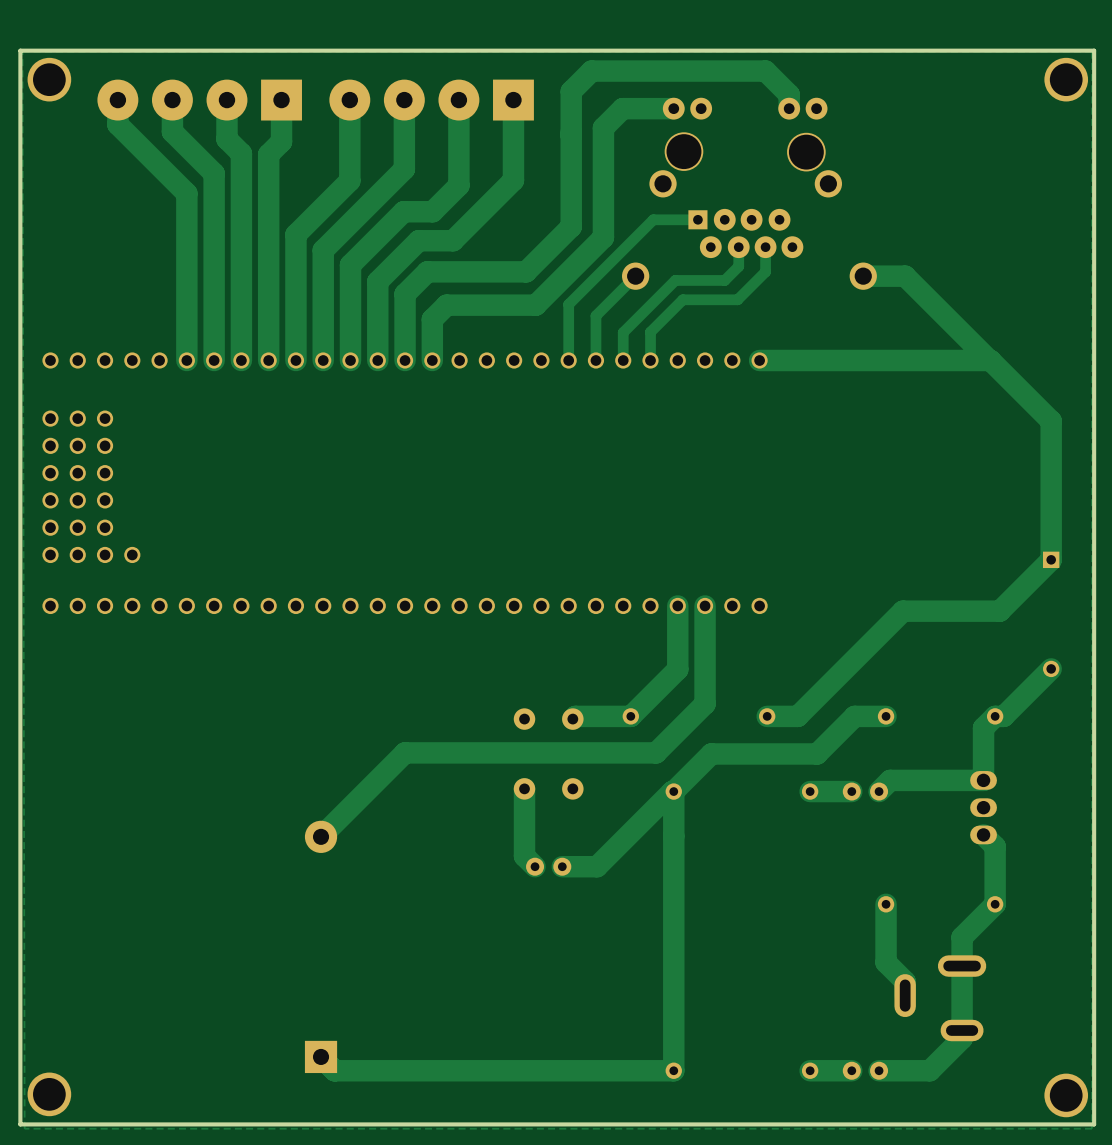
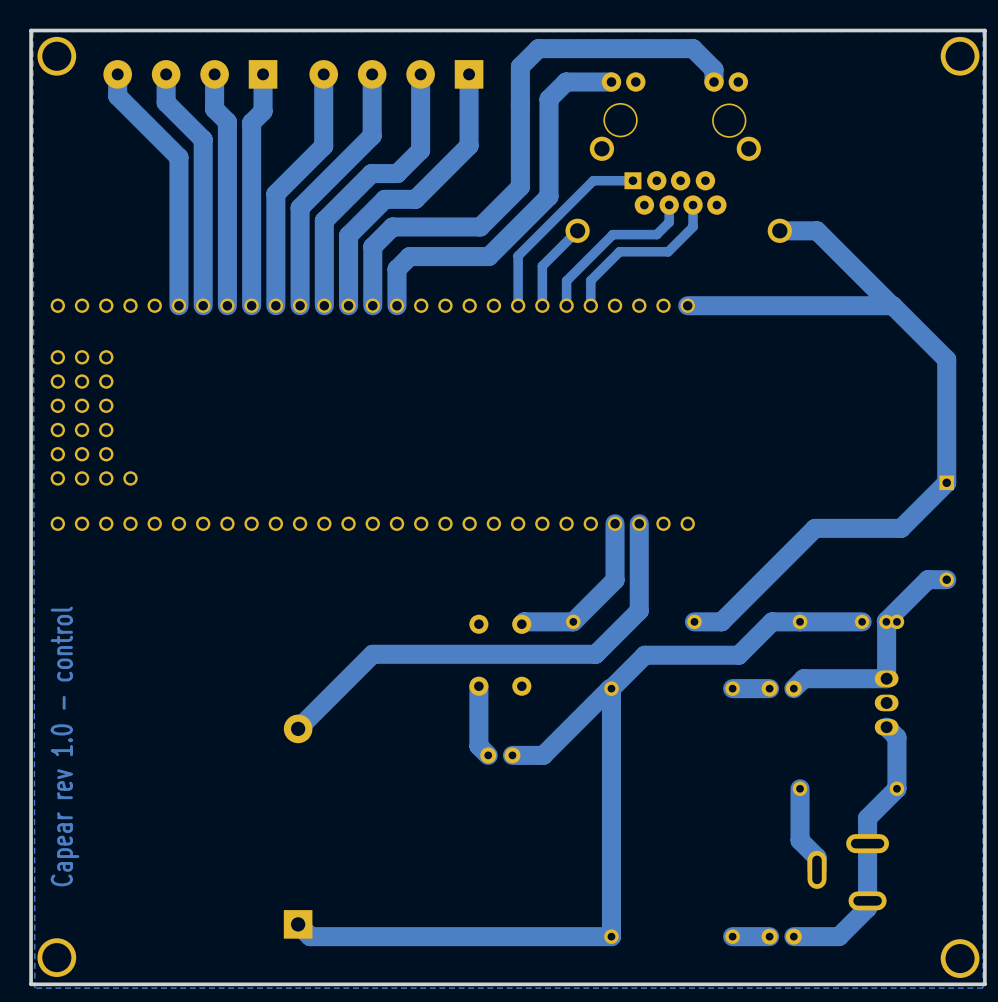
part footprint: [97, 79, 302, 121] -> [103, 60, 278, 89]
part footprint: [329, 79, 534, 121] -> [309, 60, 484, 89]
track: (1051, 668) (1003, 716) (995, 716) (983, 727) -> (946, 579) (927, 579) (886, 621) (886, 632)
track: none -> (862, 621) (800, 621)
part: none -> (874, 621)
text: none -> Capear rev 1.0 - control (65, 746)

